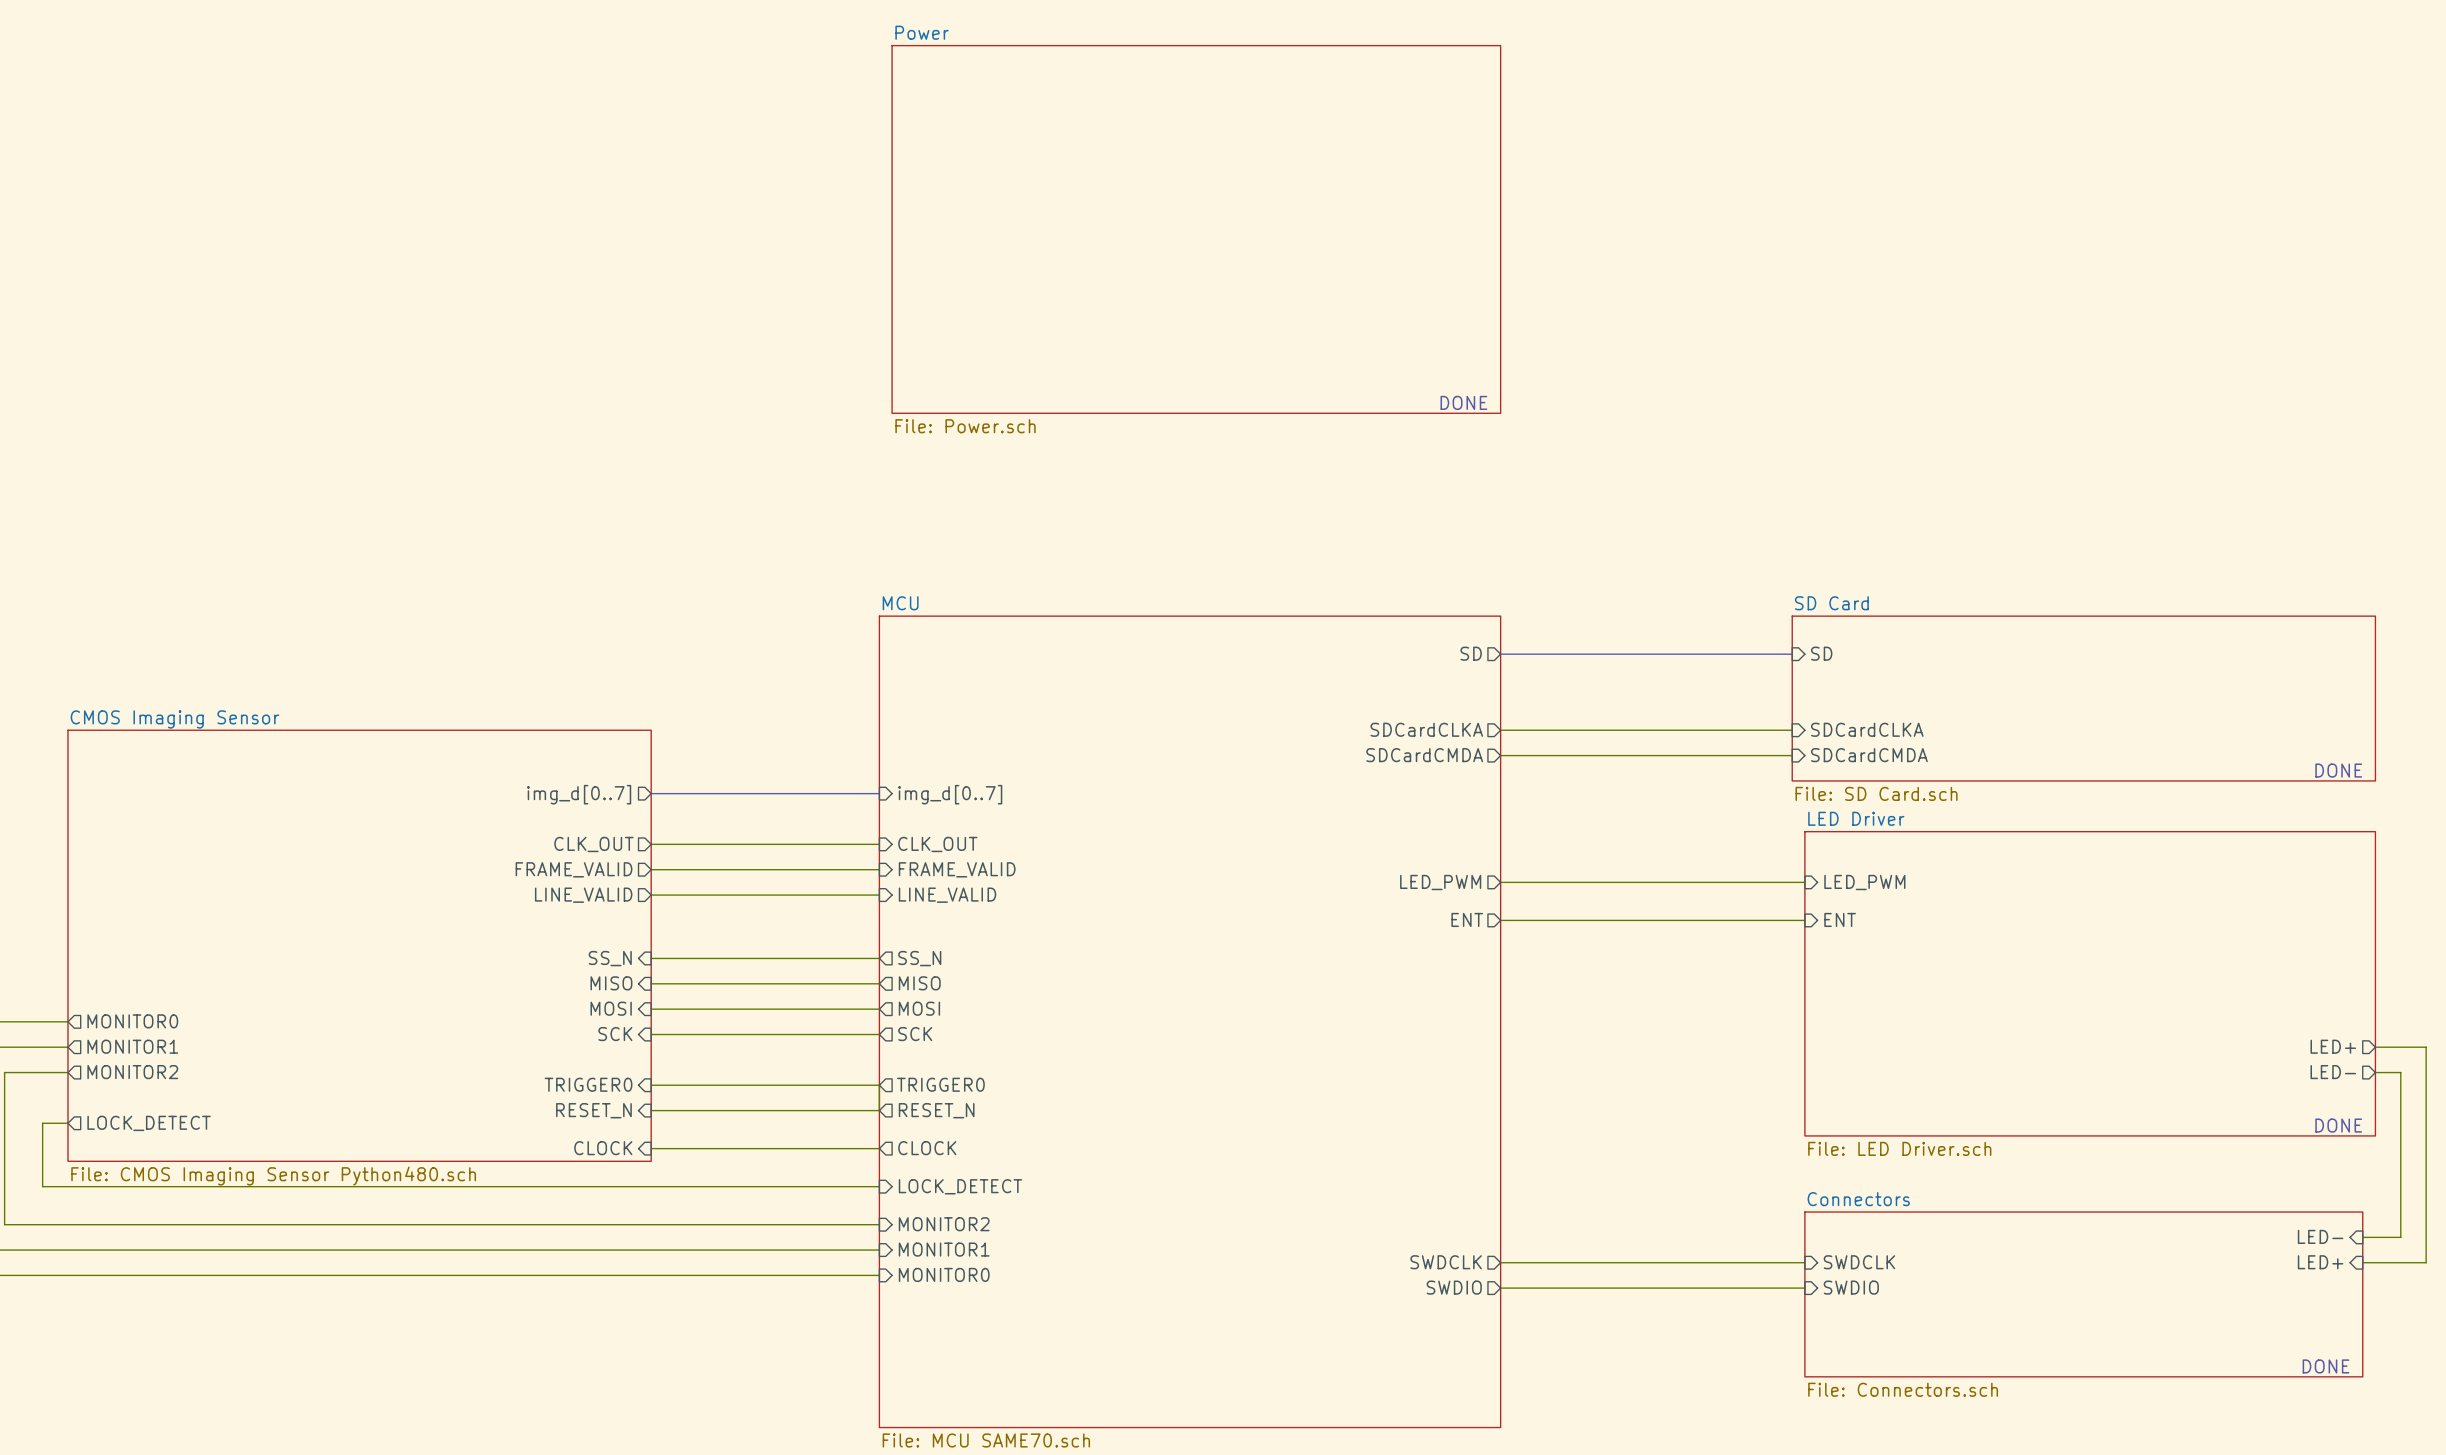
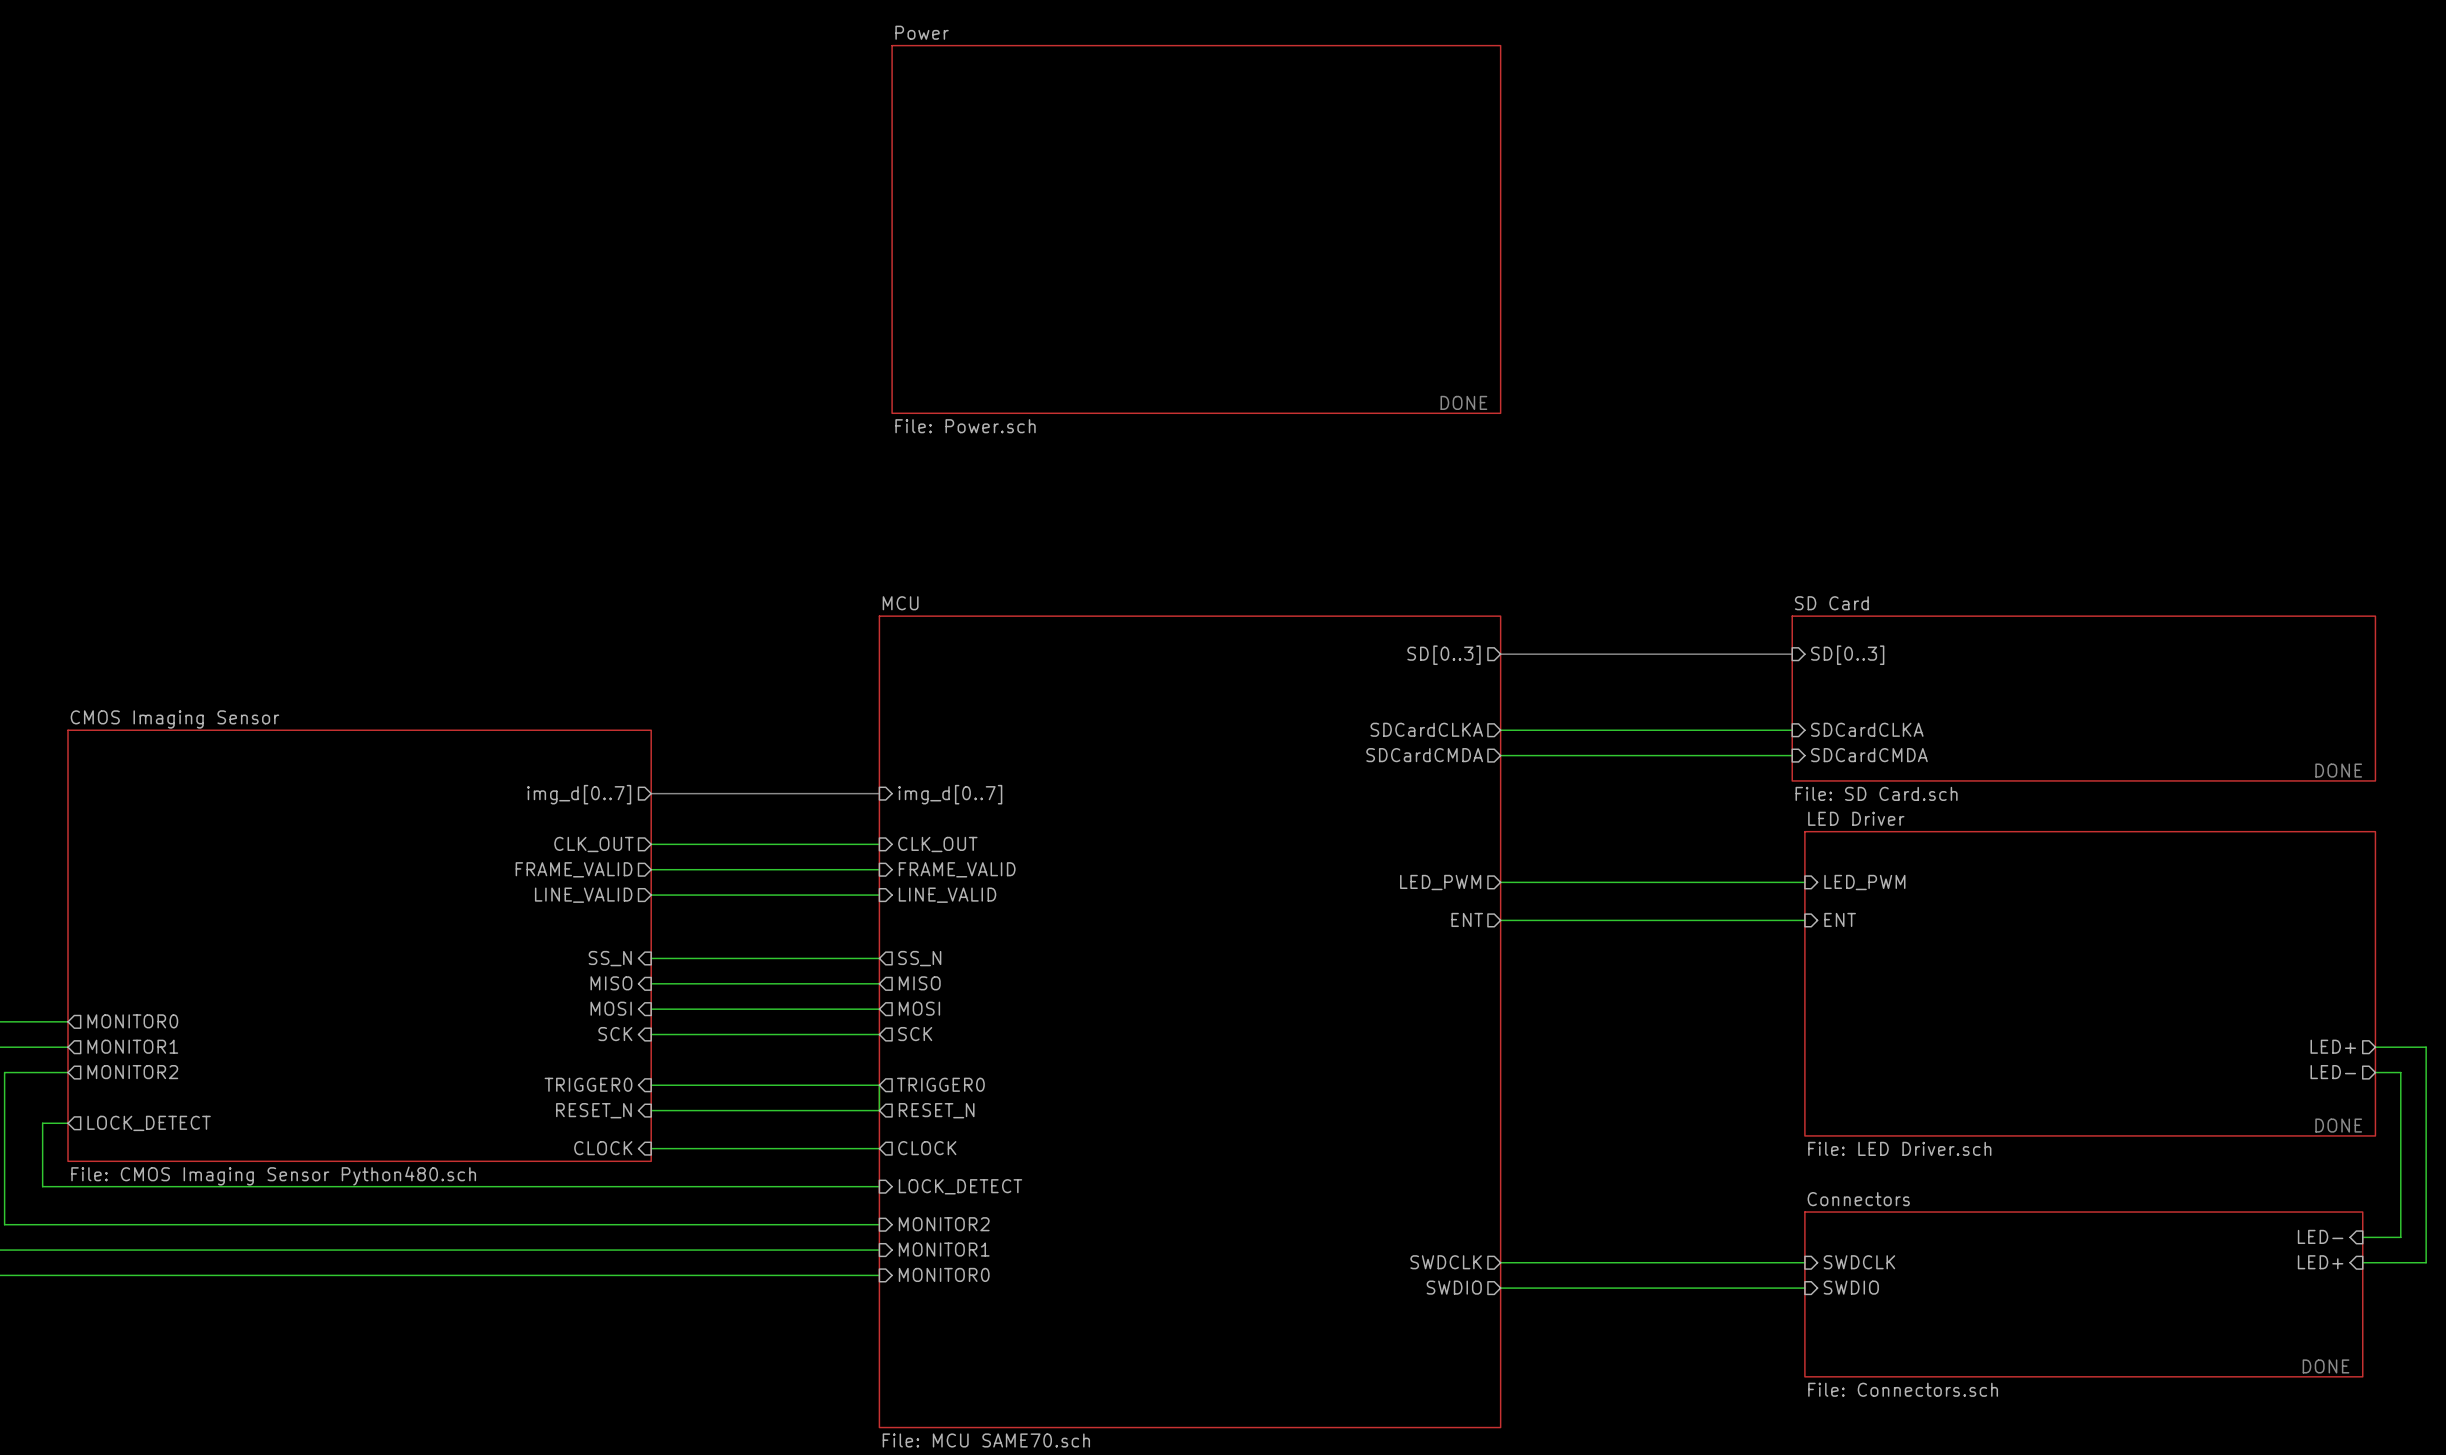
sheet pin: SD (1471, 653) -> SD[0..3] (1443, 655)
sheet pin: SD (1821, 653) -> SD[0..3] (1847, 655)

